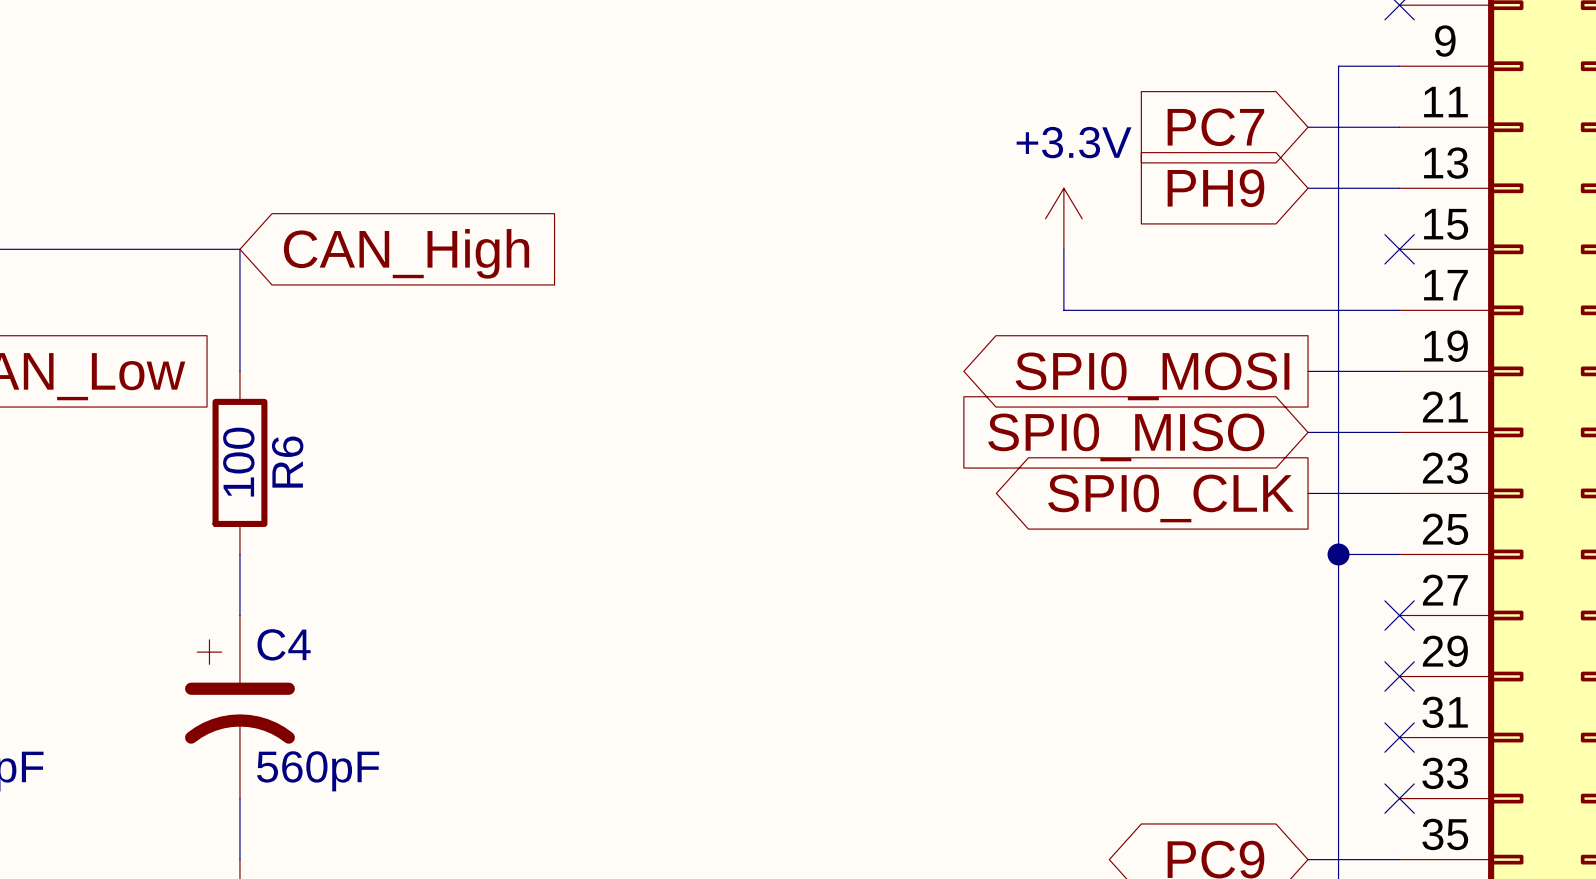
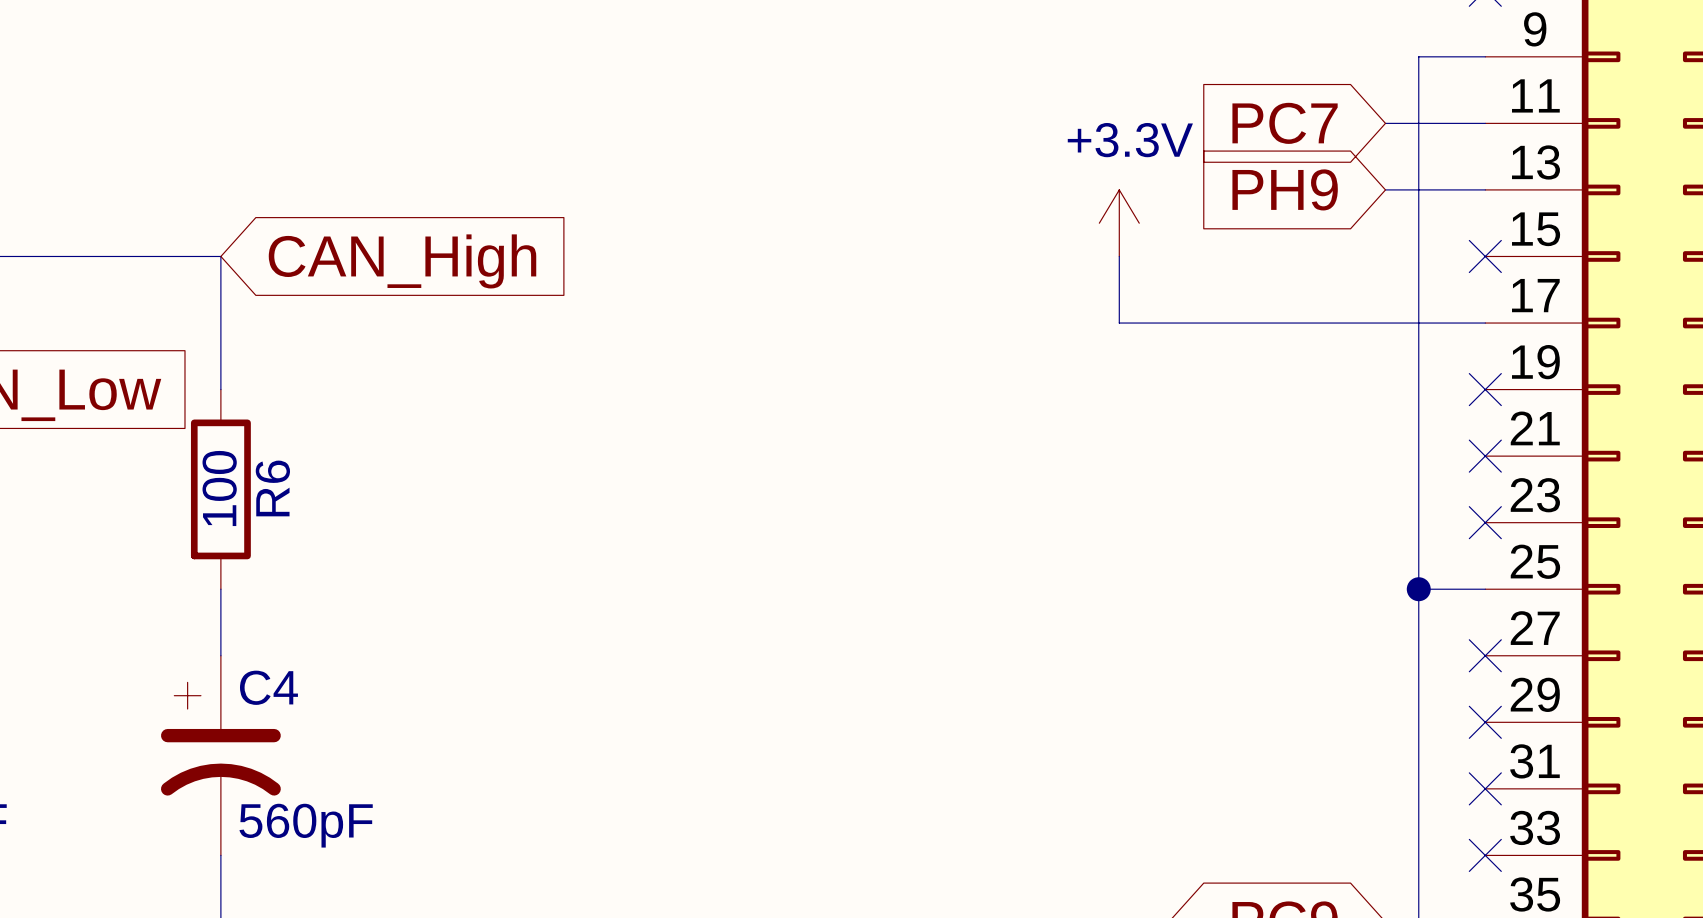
wire: (1308, 371) (1399, 371) -> none
no-connect mark: none -> (1485, 389)
global label: SPI0_MOSI (1152, 376) -> none
wire: (1308, 432) (1399, 432) -> none
no-connect mark: none -> (1485, 456)
global label: SPI0_MISO (1126, 437) -> none
wire: (1308, 493) (1399, 493) -> none
no-connect mark: none -> (1485, 522)
global label: SPI0_CLK (1170, 498) -> none

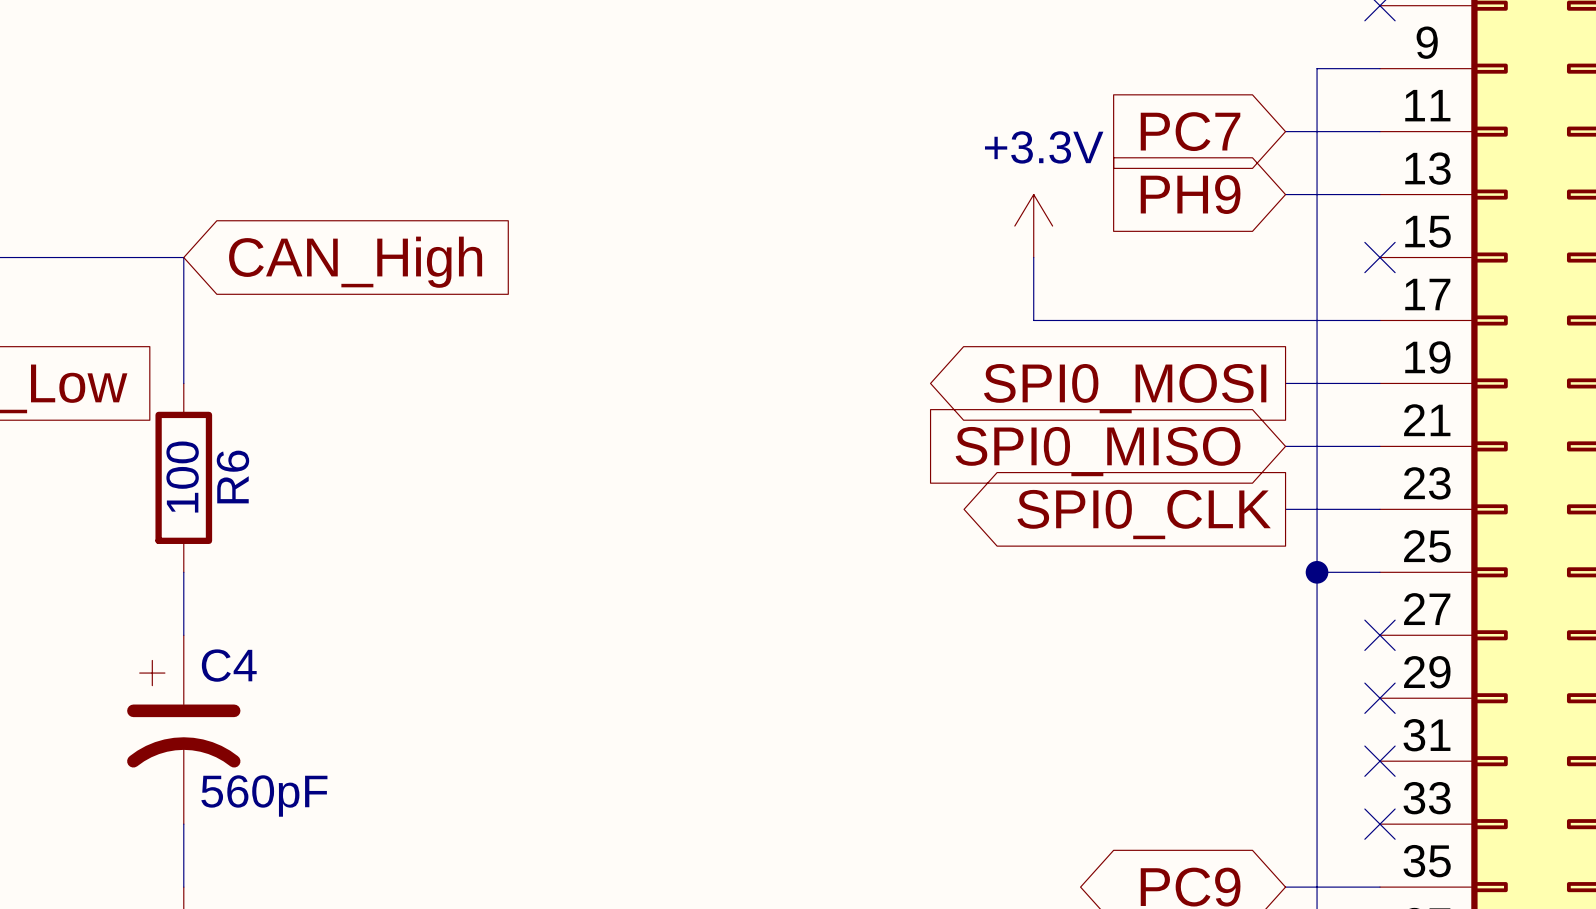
wire: none -> (1285, 383) (1379, 383)
no-connect mark: (1485, 389) -> none
global label: none -> SPI0_MOSI (1125, 388)
wire: none -> (1285, 446) (1379, 446)
no-connect mark: (1485, 456) -> none
global label: none -> SPI0_MISO (1098, 451)
wire: none -> (1285, 509) (1379, 509)
no-connect mark: (1485, 522) -> none
global label: none -> SPI0_CLK (1144, 514)

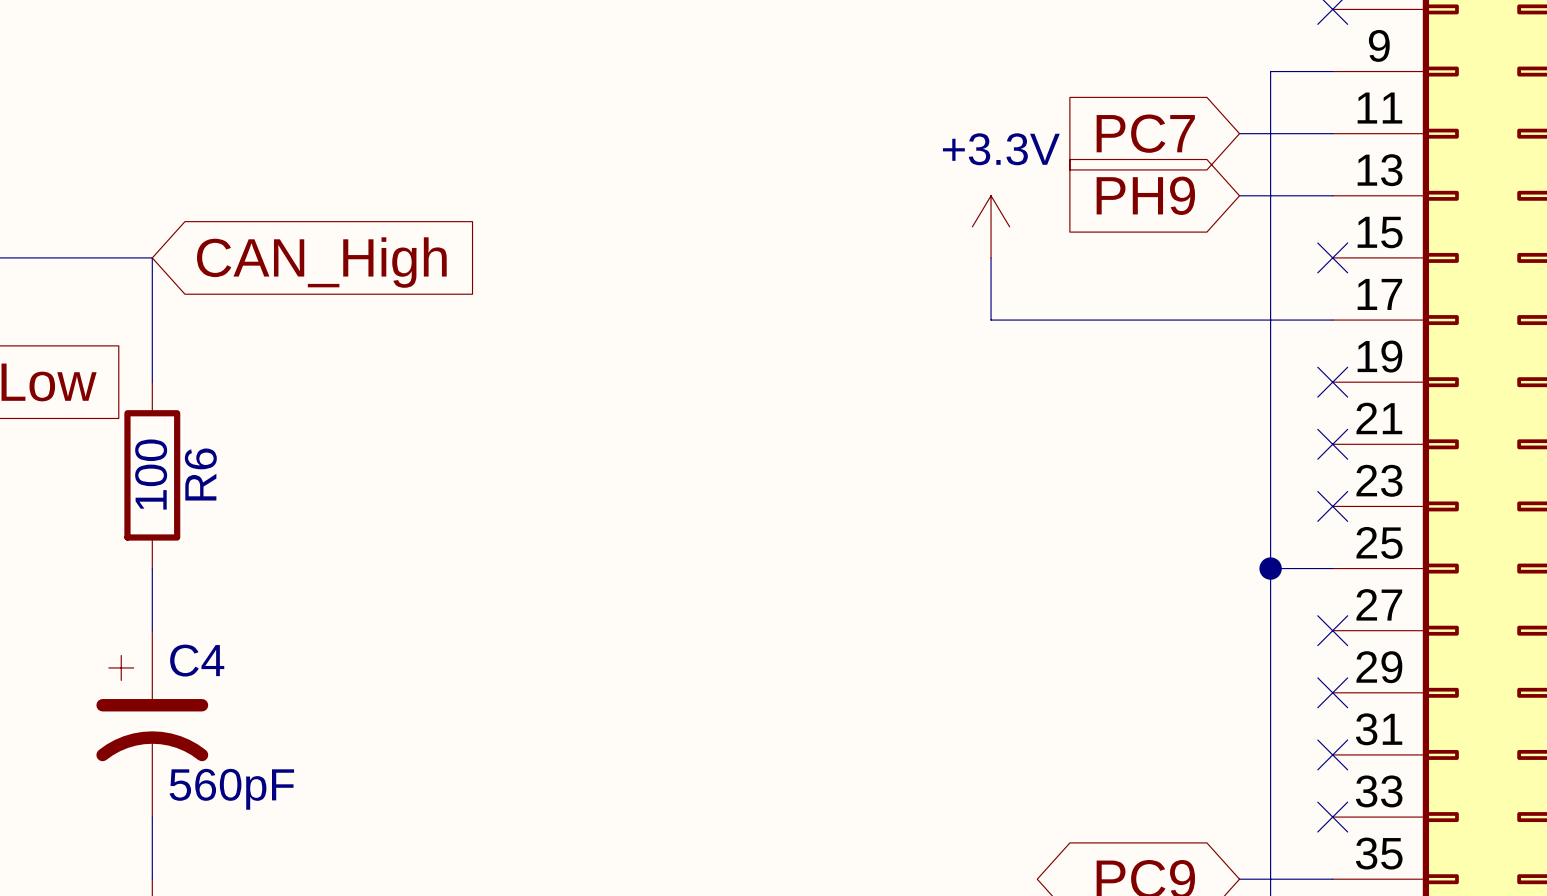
wire: (1285, 383) (1379, 383) -> none
no-connect mark: none -> (1332, 382)
global label: SPI0_MOSI (1125, 388) -> none
wire: (1285, 446) (1379, 446) -> none
no-connect mark: none -> (1332, 444)
global label: SPI0_MISO (1098, 451) -> none
wire: (1285, 509) (1379, 509) -> none
no-connect mark: none -> (1332, 506)
global label: SPI0_CLK (1144, 514) -> none

